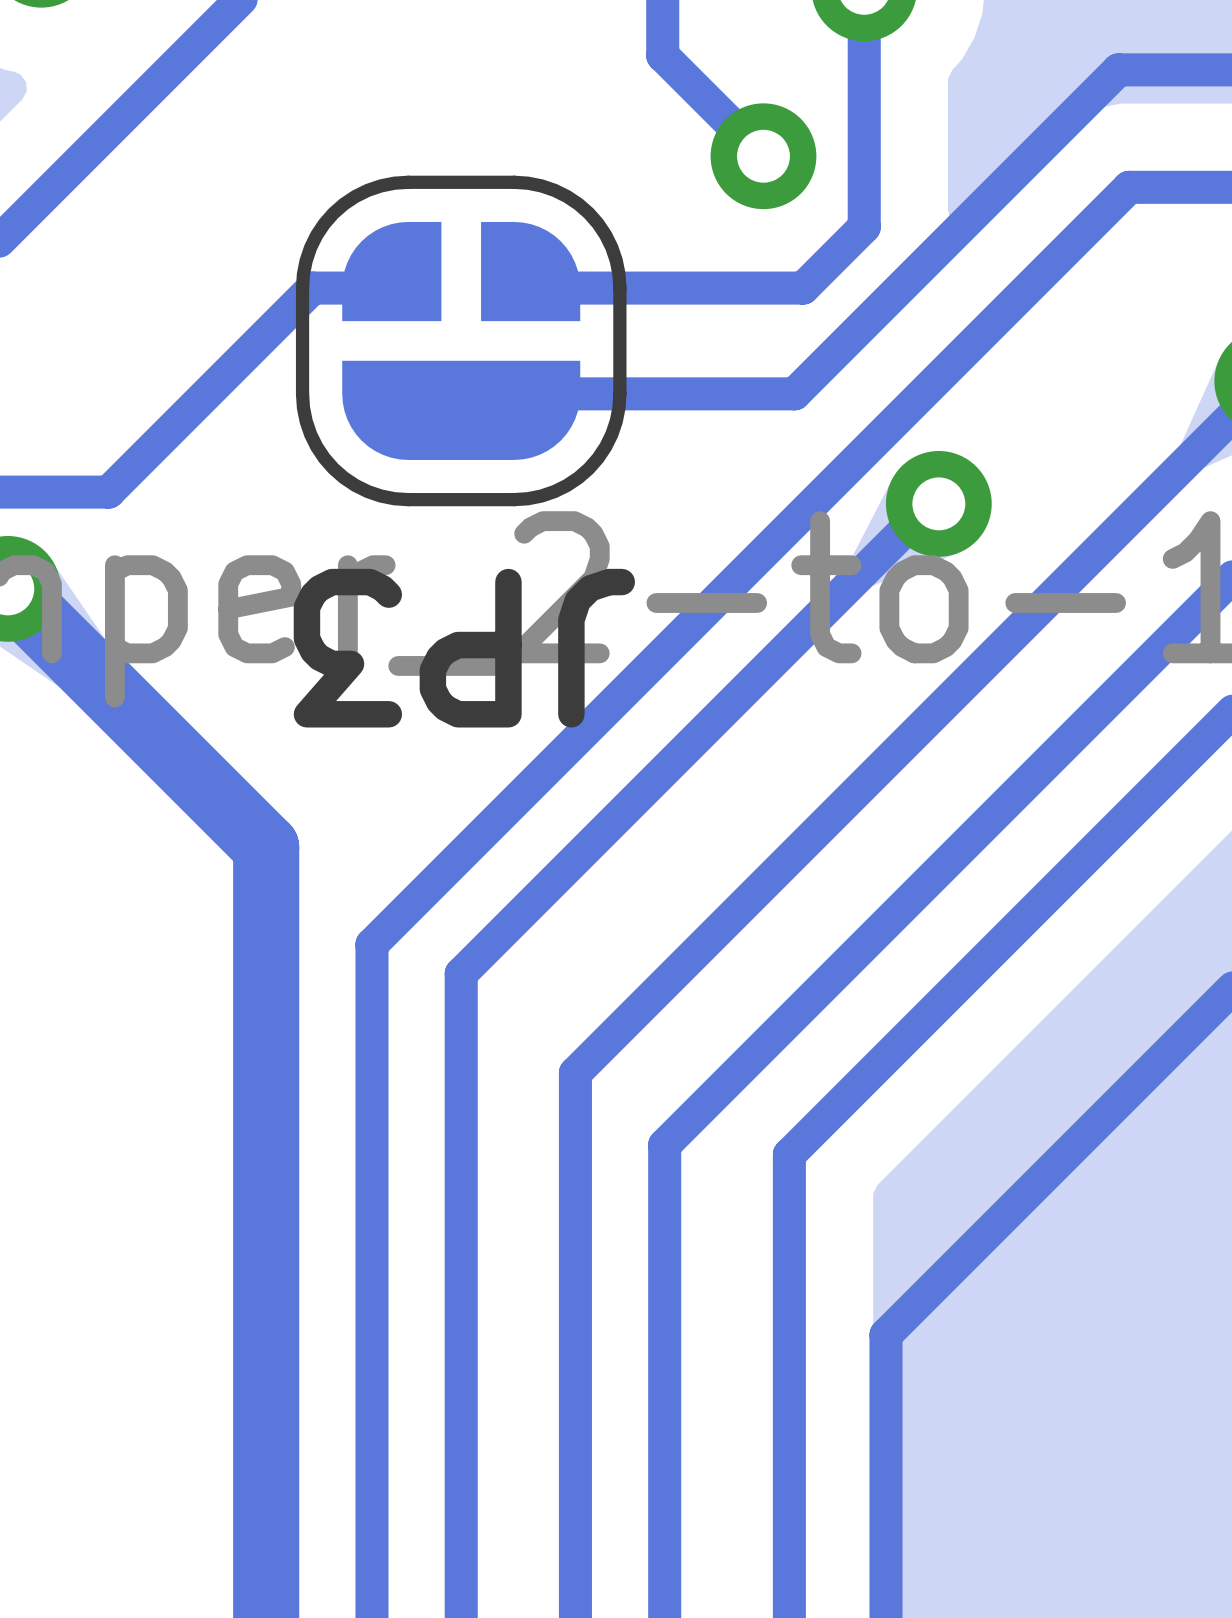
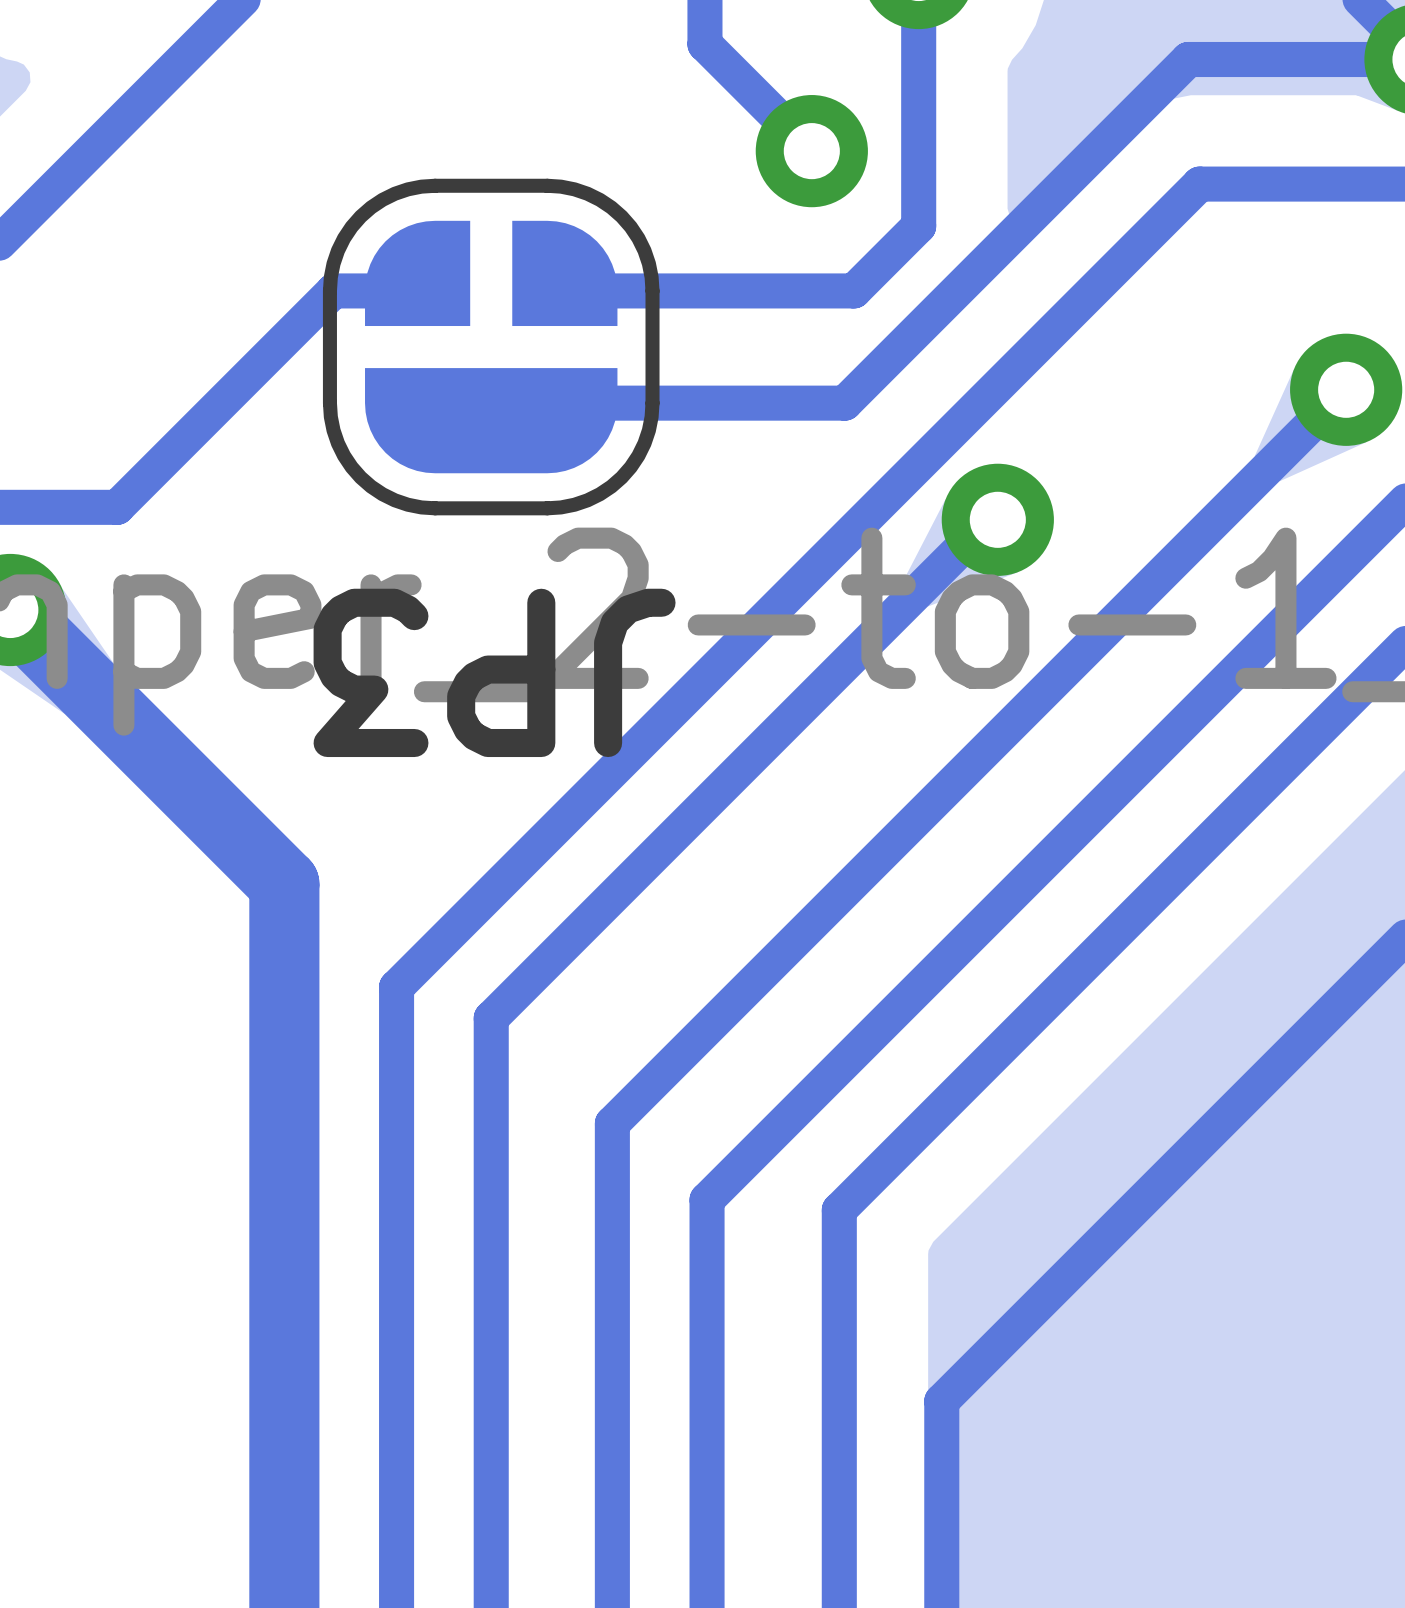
JP3 footprint: [295, 175, 627, 507] -> [322, 178, 660, 516]

